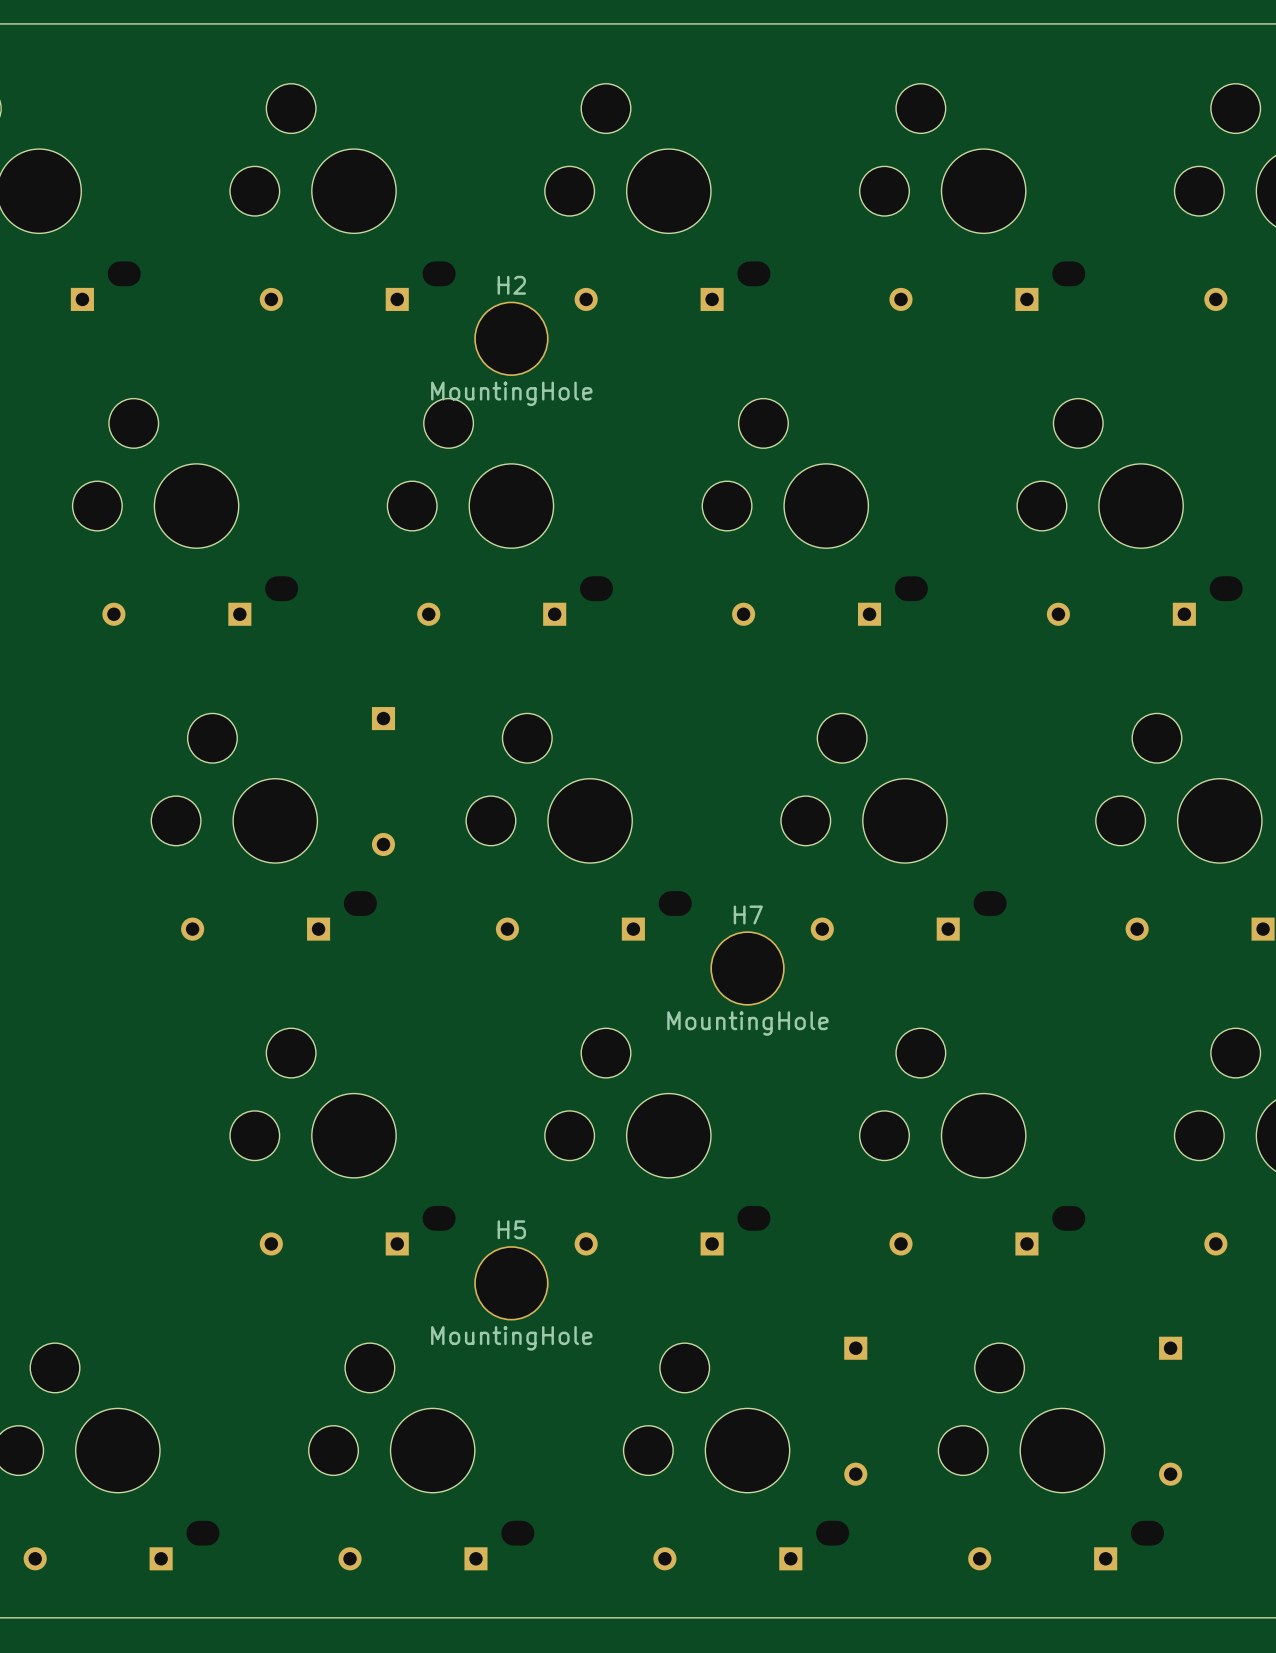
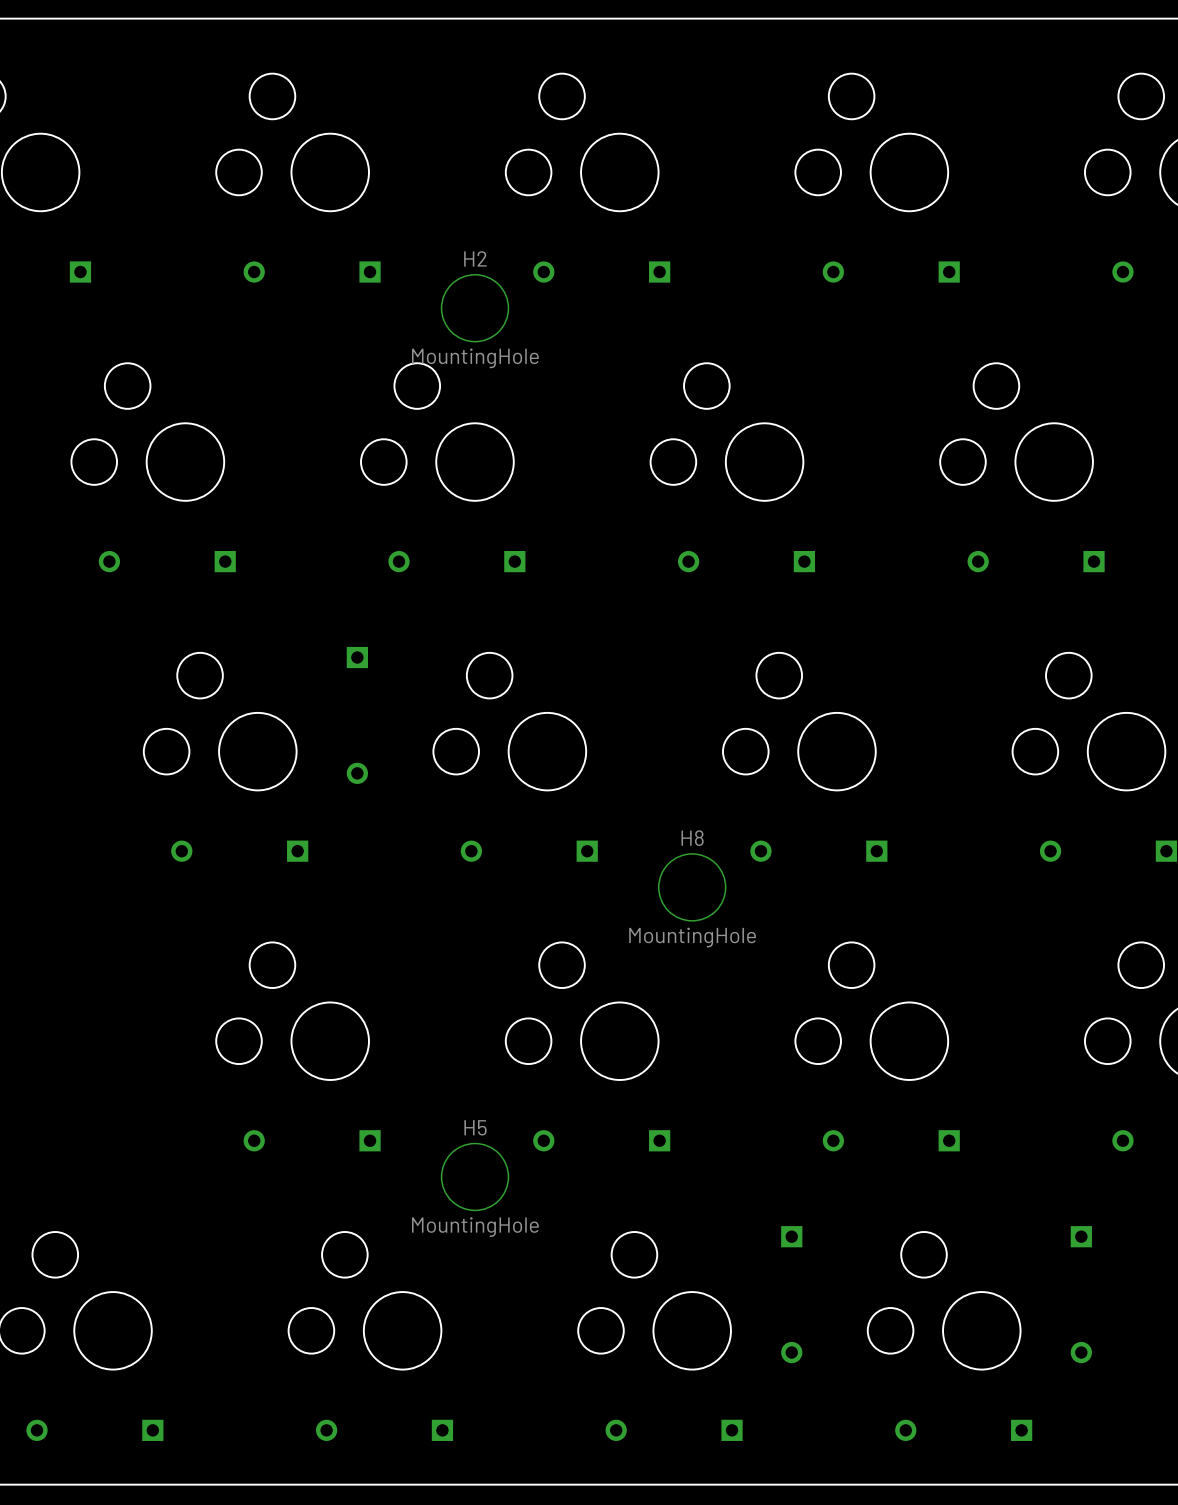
H7 name: H7 (748, 914) -> H8 (692, 838)

